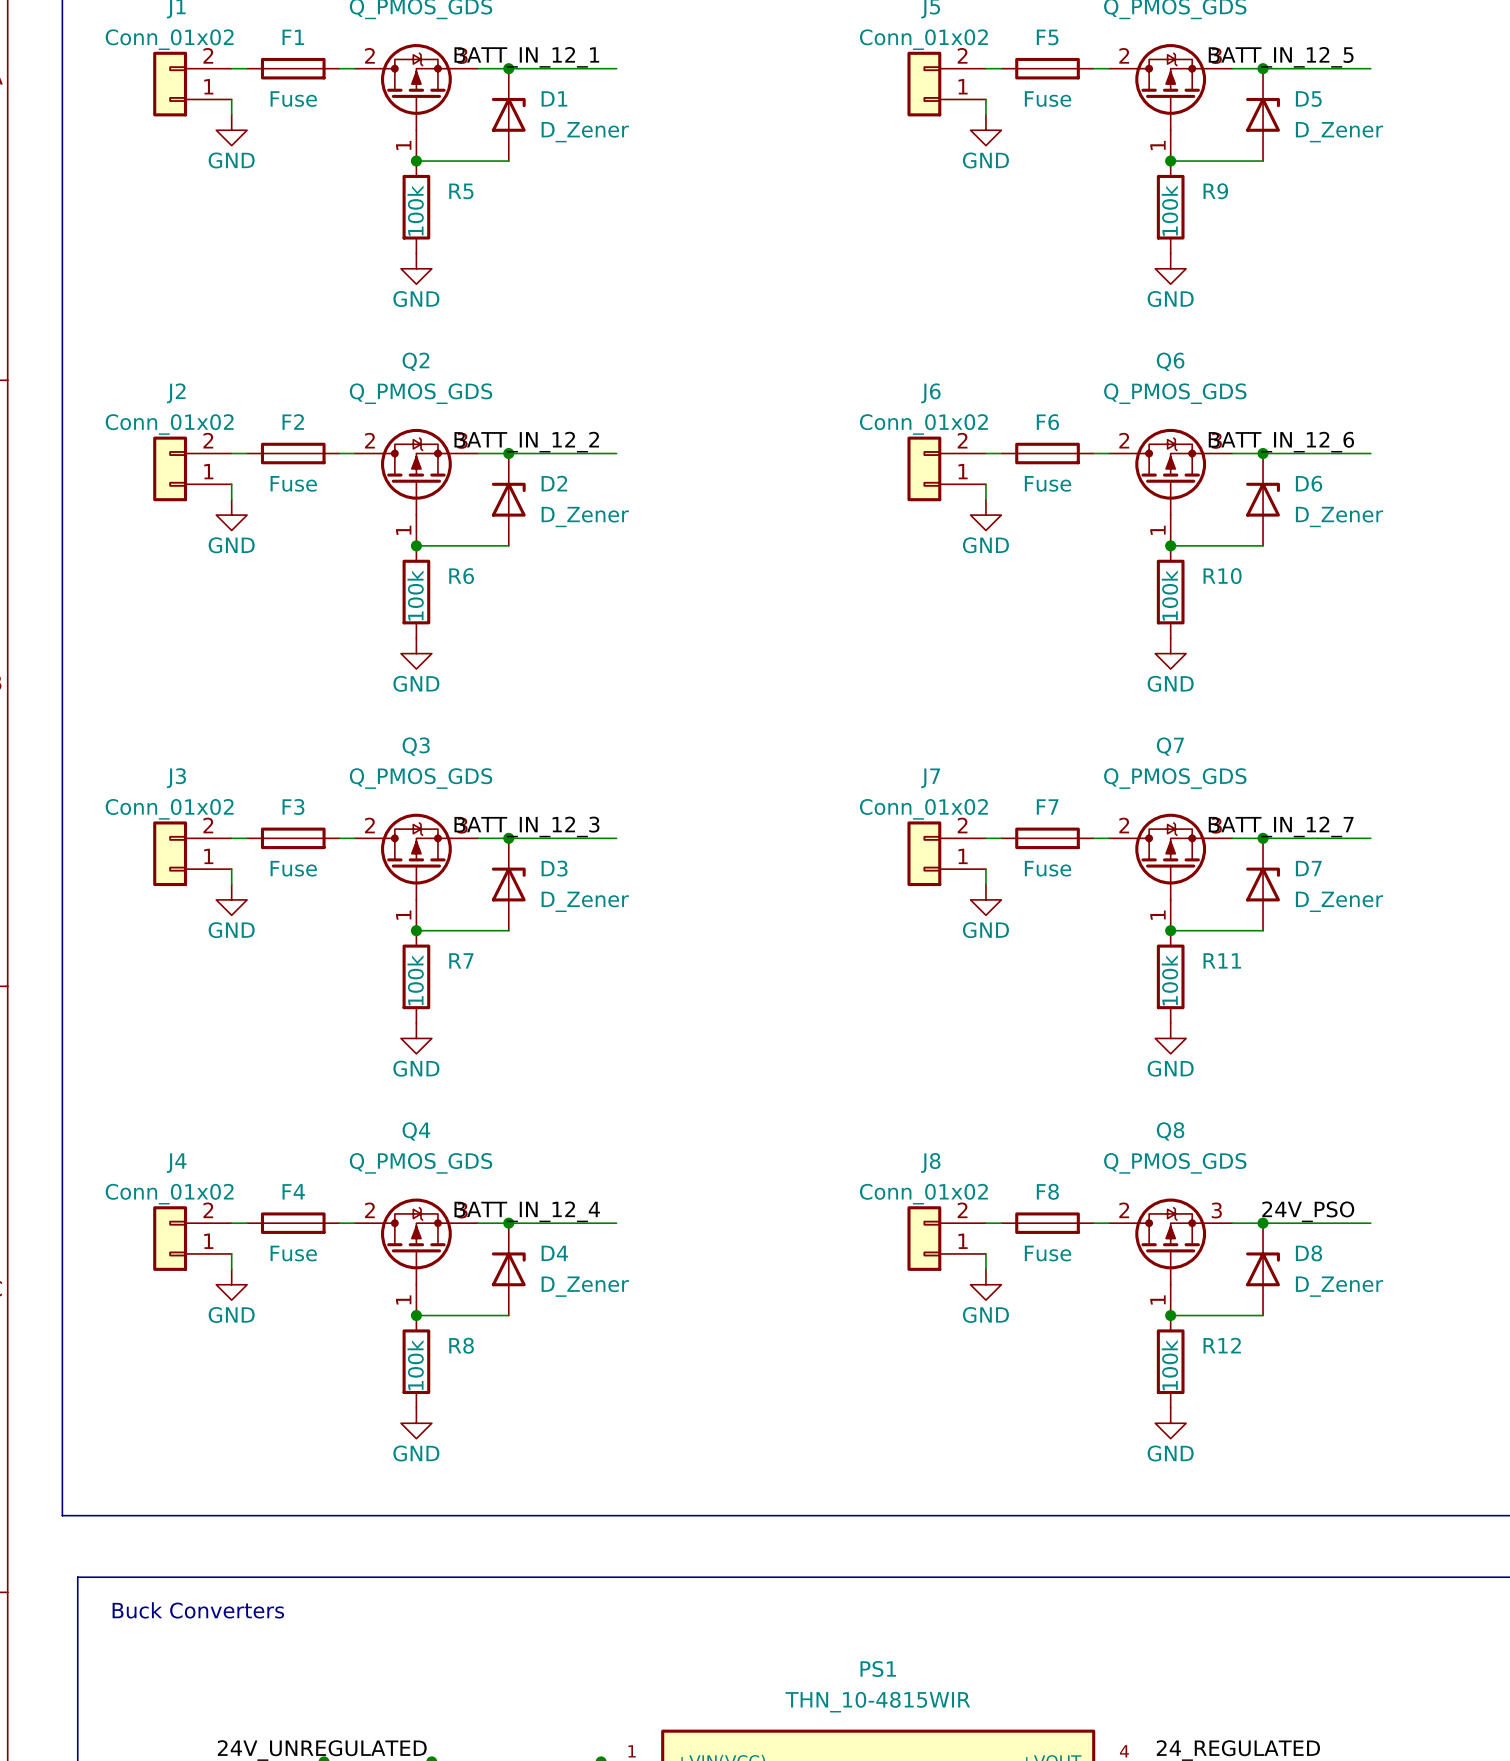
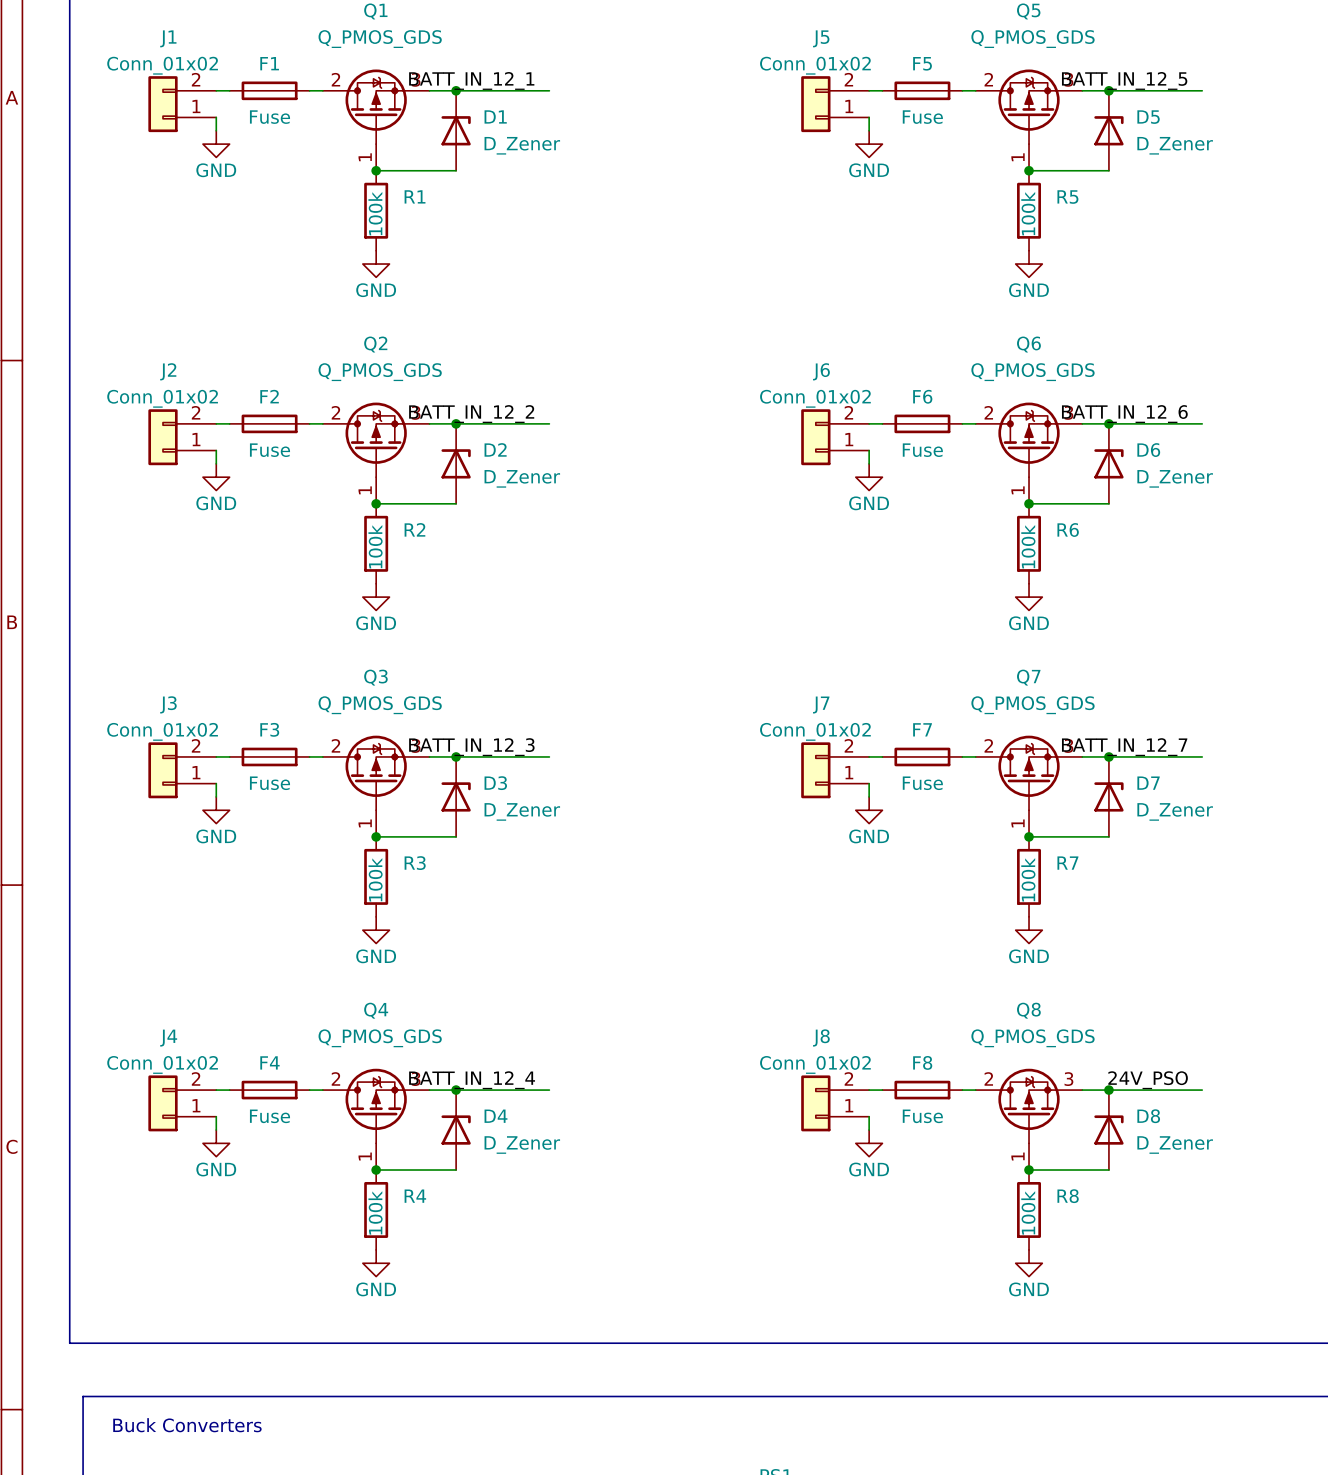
R5 name: R5 (461, 191) -> R1 (415, 196)
R9 name: R9 (1215, 191) -> R5 (1067, 197)
R6 name: R6 (461, 576) -> R2 (414, 529)
R10 name: R10 (1222, 576) -> R6 (1068, 529)
R7 name: R7 (461, 960) -> R3 (415, 863)
R11 name: R11 (1222, 960) -> R7 (1067, 863)
R8 name: R8 (461, 1345) -> R4 (415, 1196)
R12 name: R12 (1222, 1345) -> R8 (1068, 1196)

